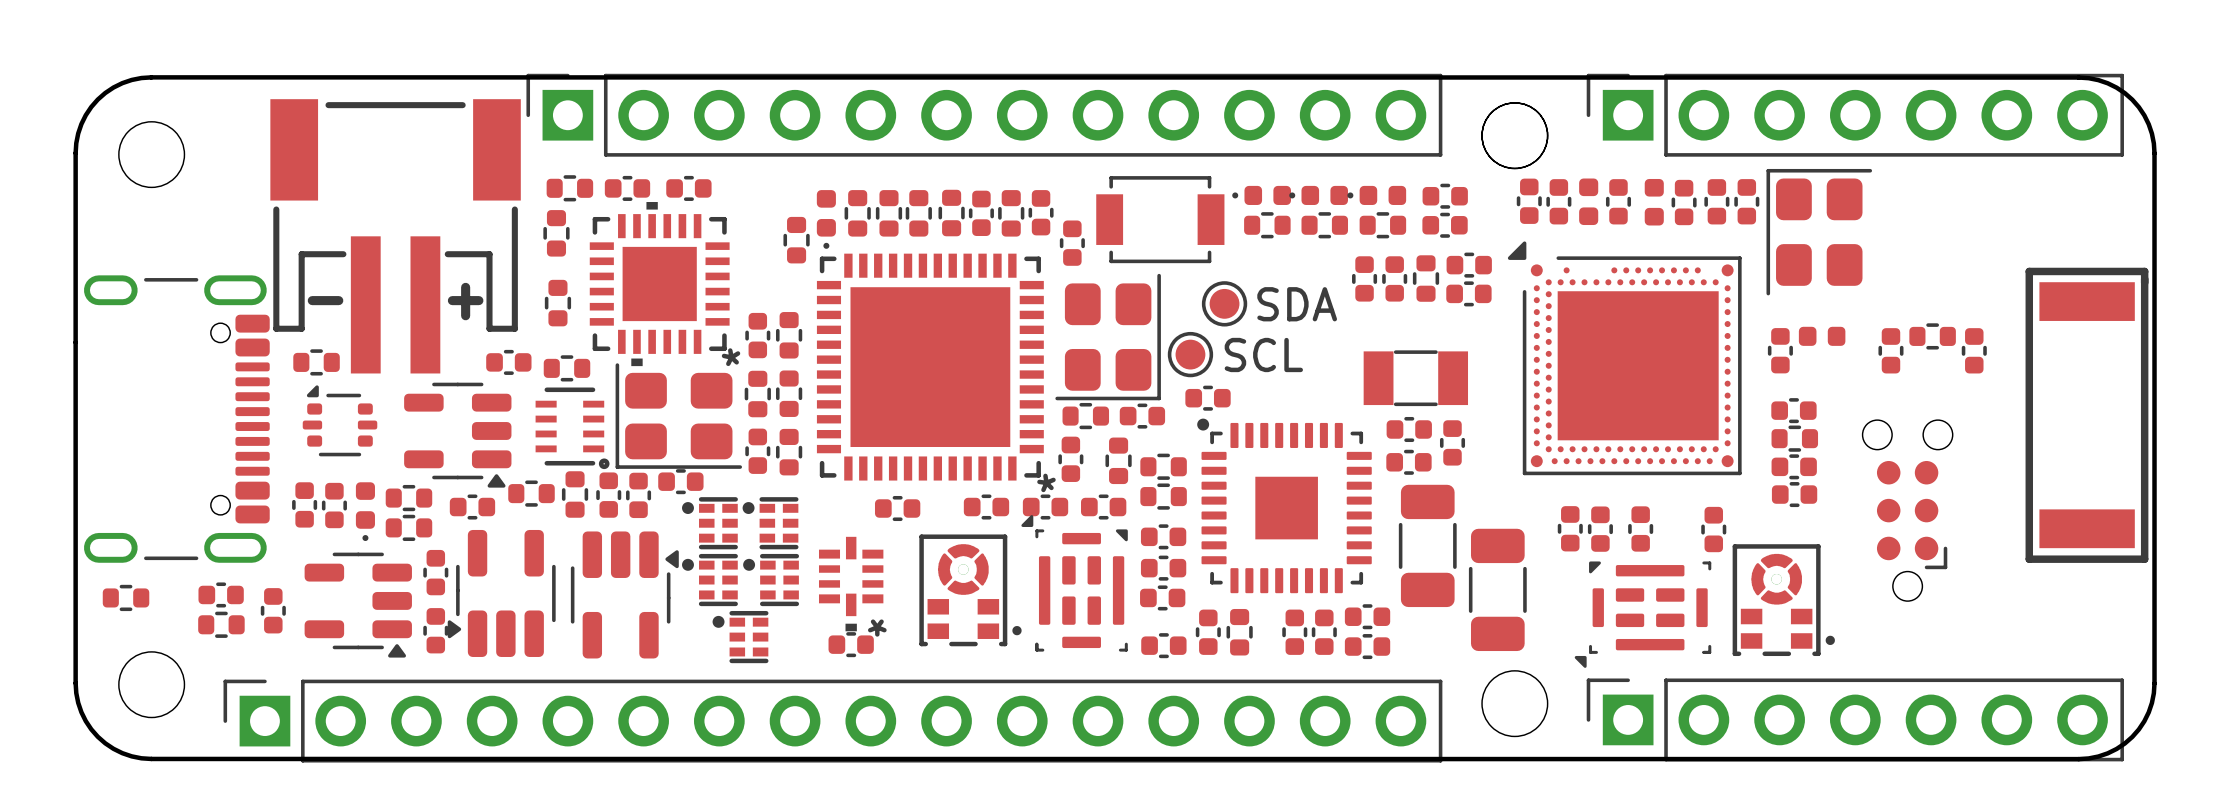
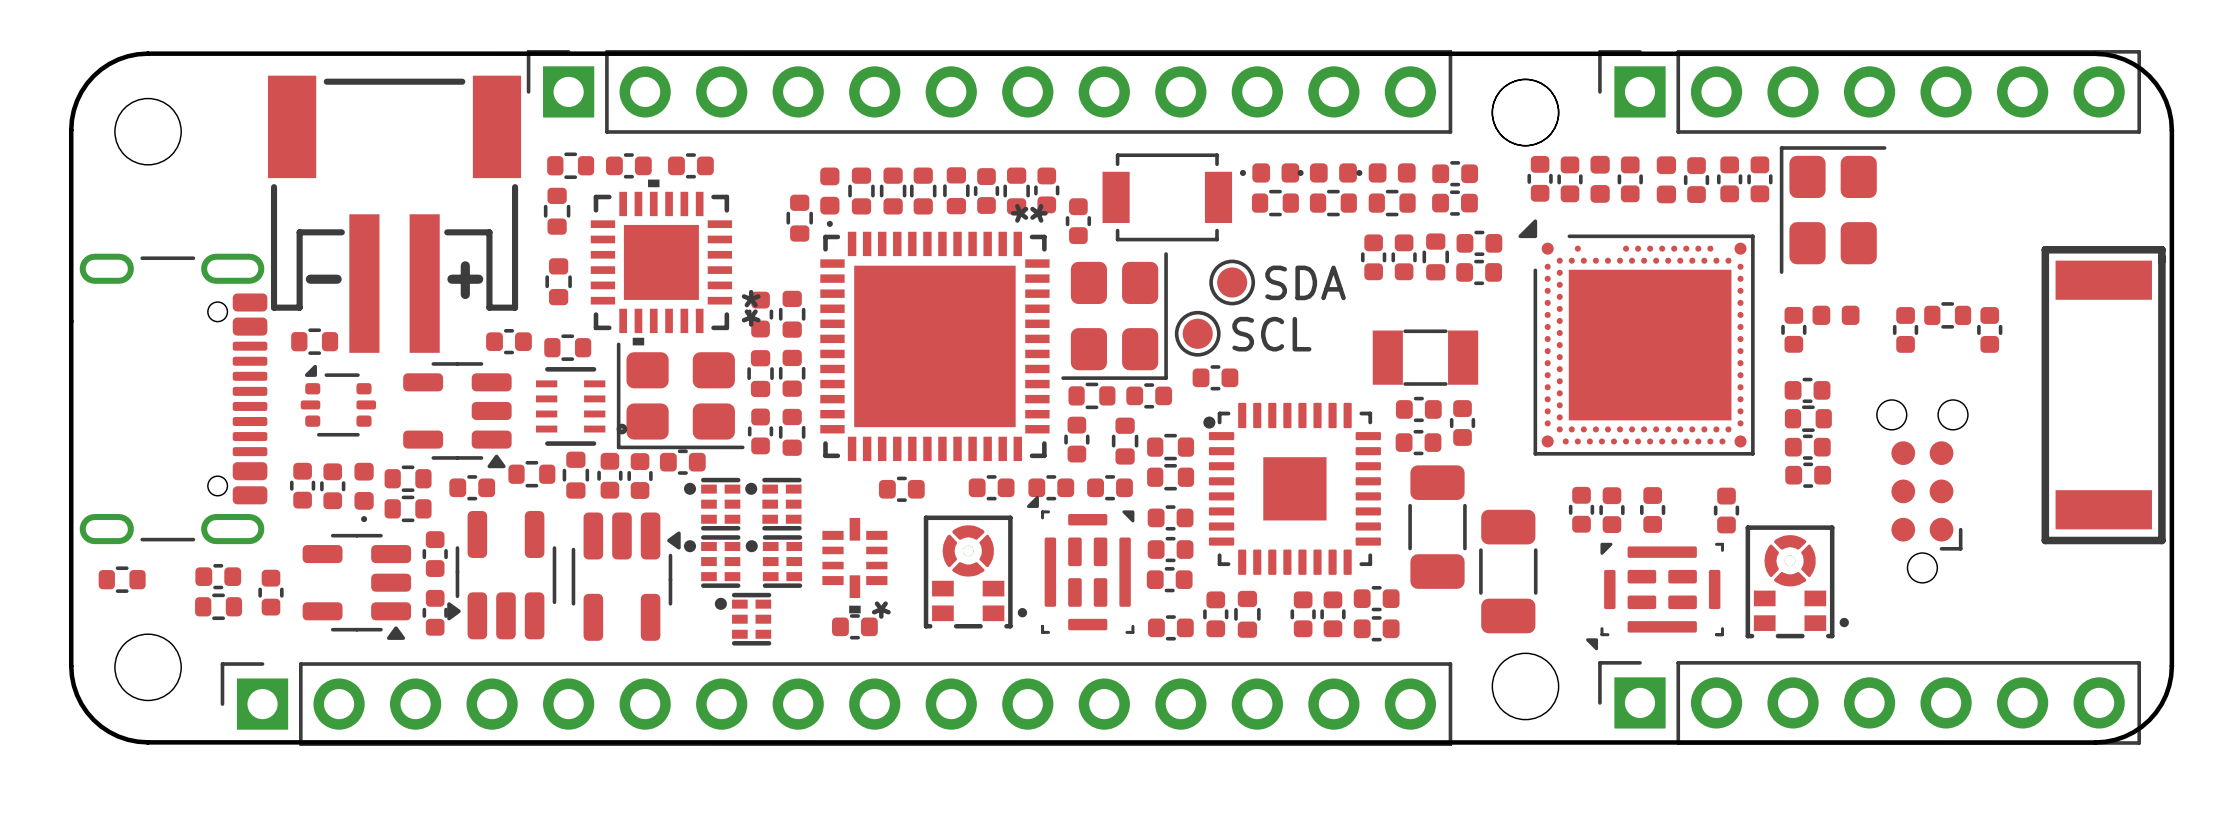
part footprint: [589, 202, 730, 367] -> [590, 179, 733, 346]
part footprint: [816, 253, 1044, 481] -> [820, 231, 1050, 462]
part footprint: [535, 387, 610, 470] -> [536, 367, 628, 446]
part footprint: [1197, 418, 1372, 594] -> [1203, 402, 1381, 575]
text: * (1046, 482) -> none

